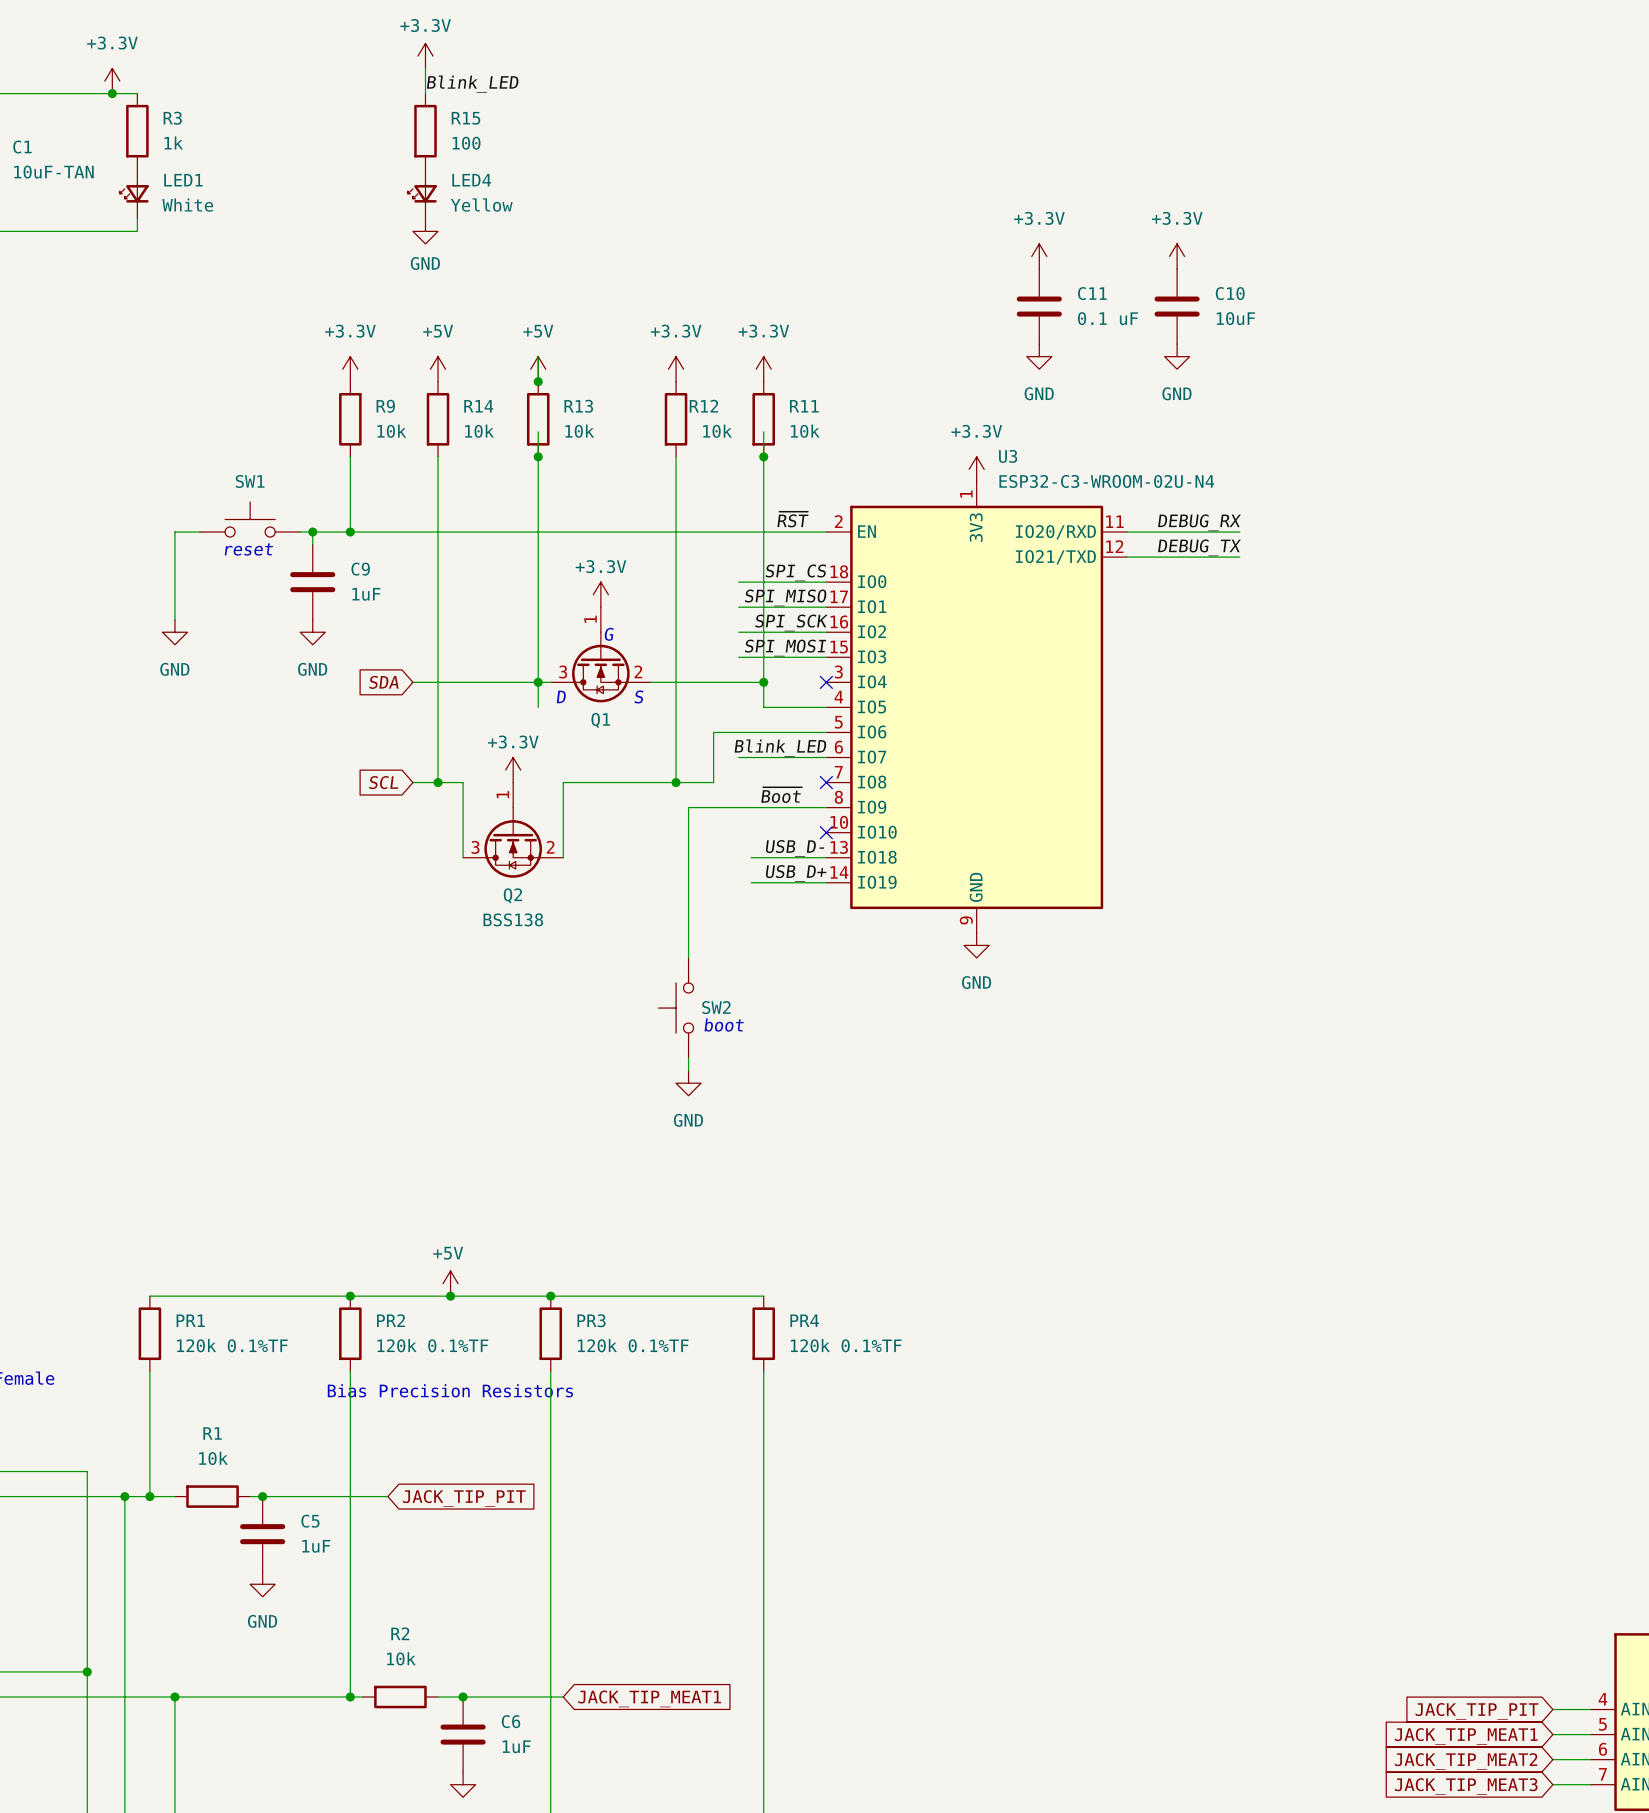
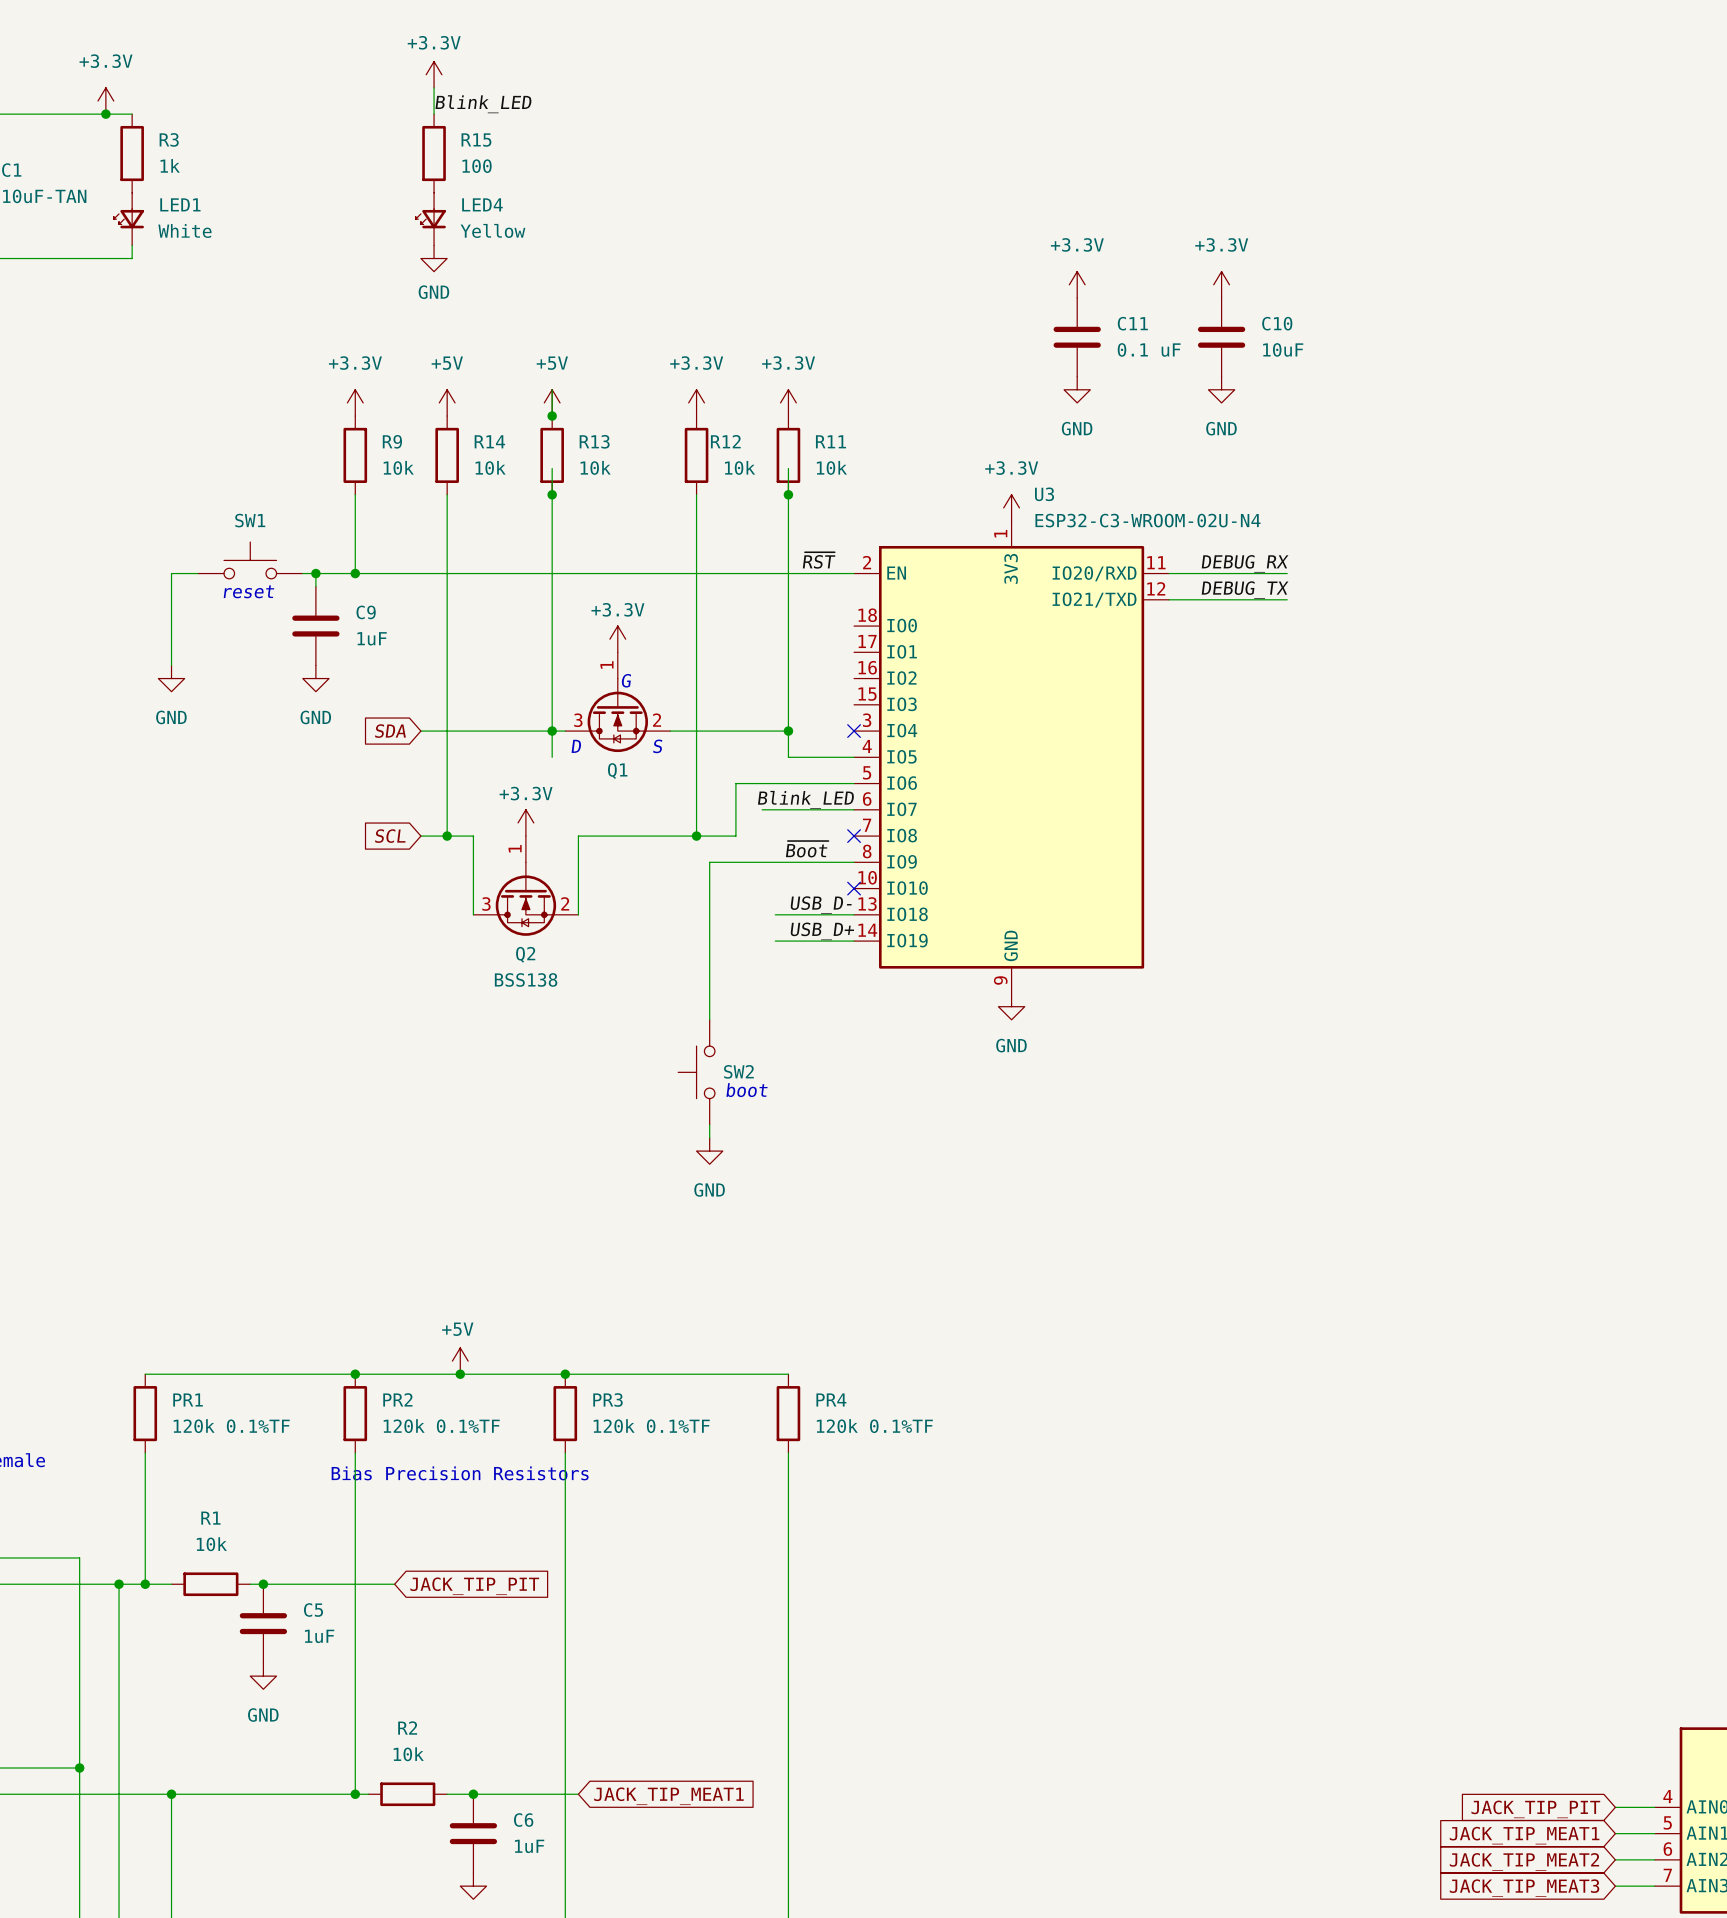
label: SPI_CS (795, 572) -> none
wire: (738, 582) (826, 582) -> none
label: SPI_MISO (785, 597) -> none
wire: (738, 607) (826, 607) -> none
label: SPI_SCK (791, 622) -> none
wire: (738, 632) (826, 632) -> none
label: SPI_MOSI (785, 648) -> none
wire: (738, 657) (826, 657) -> none

